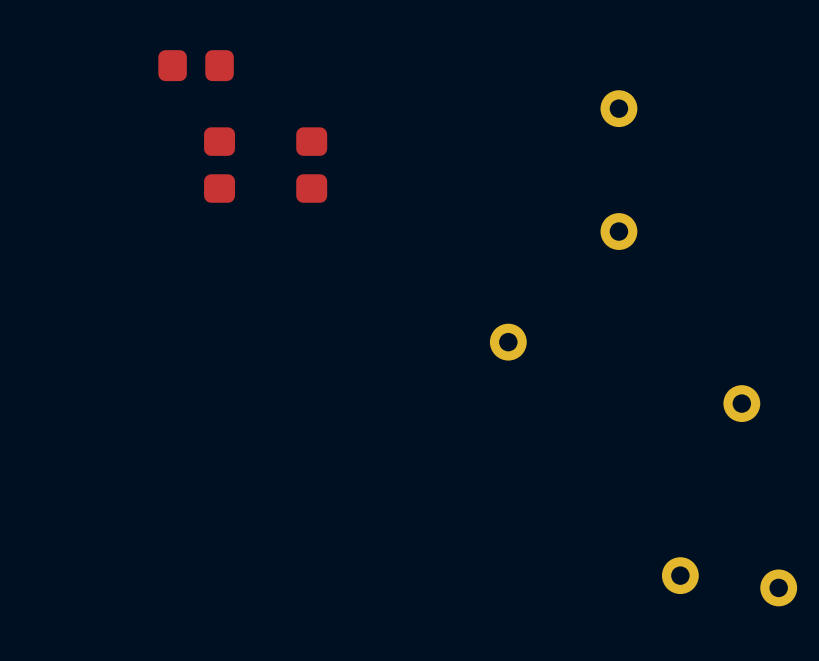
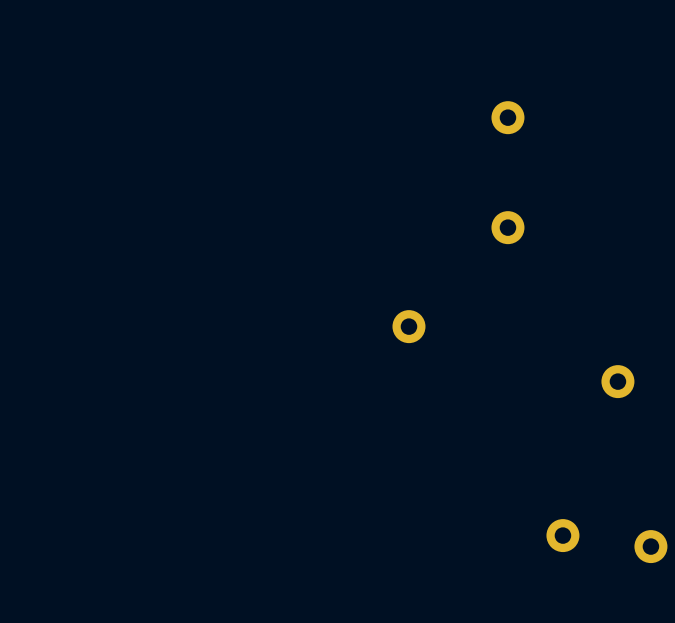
part: (196, 65) -> none
part: (219, 165) -> none
part: (311, 165) -> none

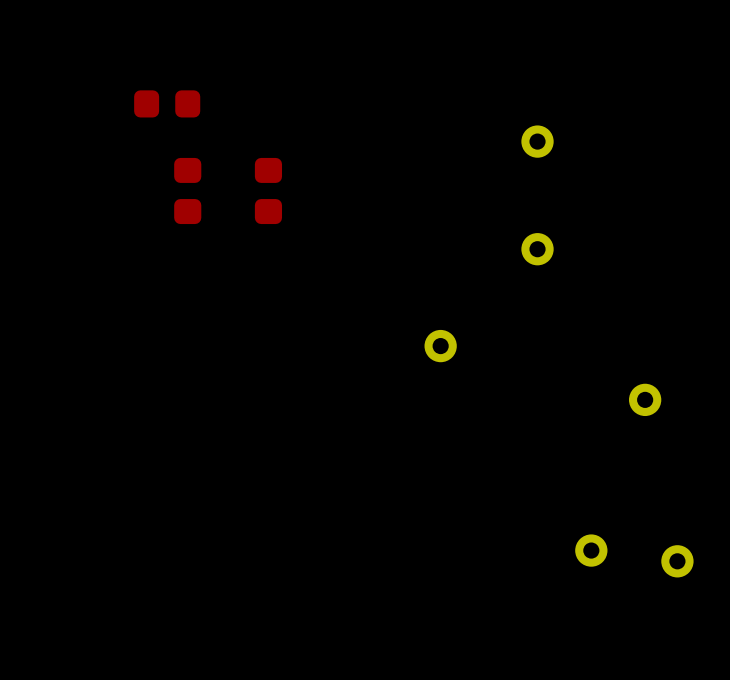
part: none -> (167, 103)
part: none -> (187, 190)
part: none -> (268, 190)

